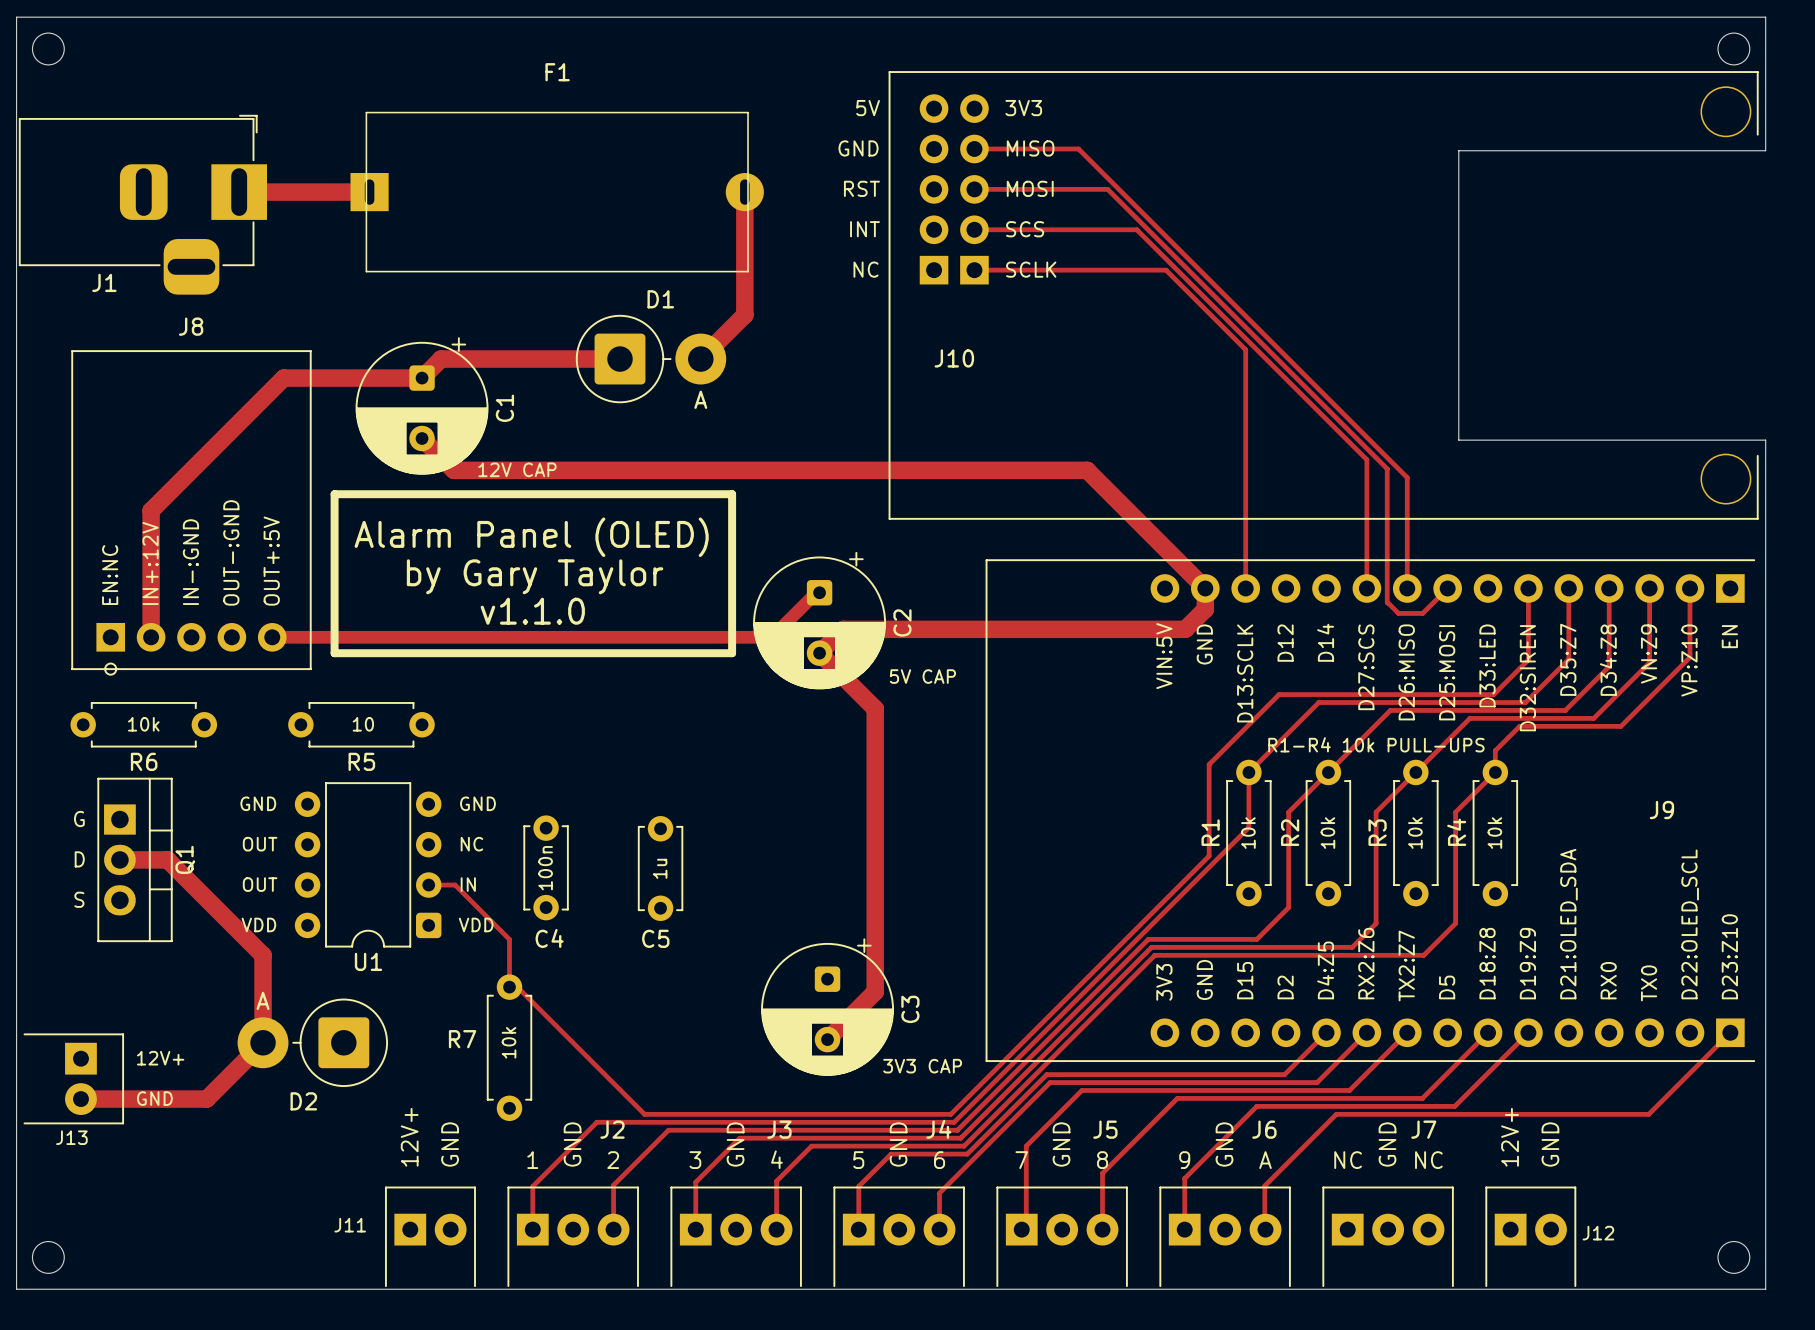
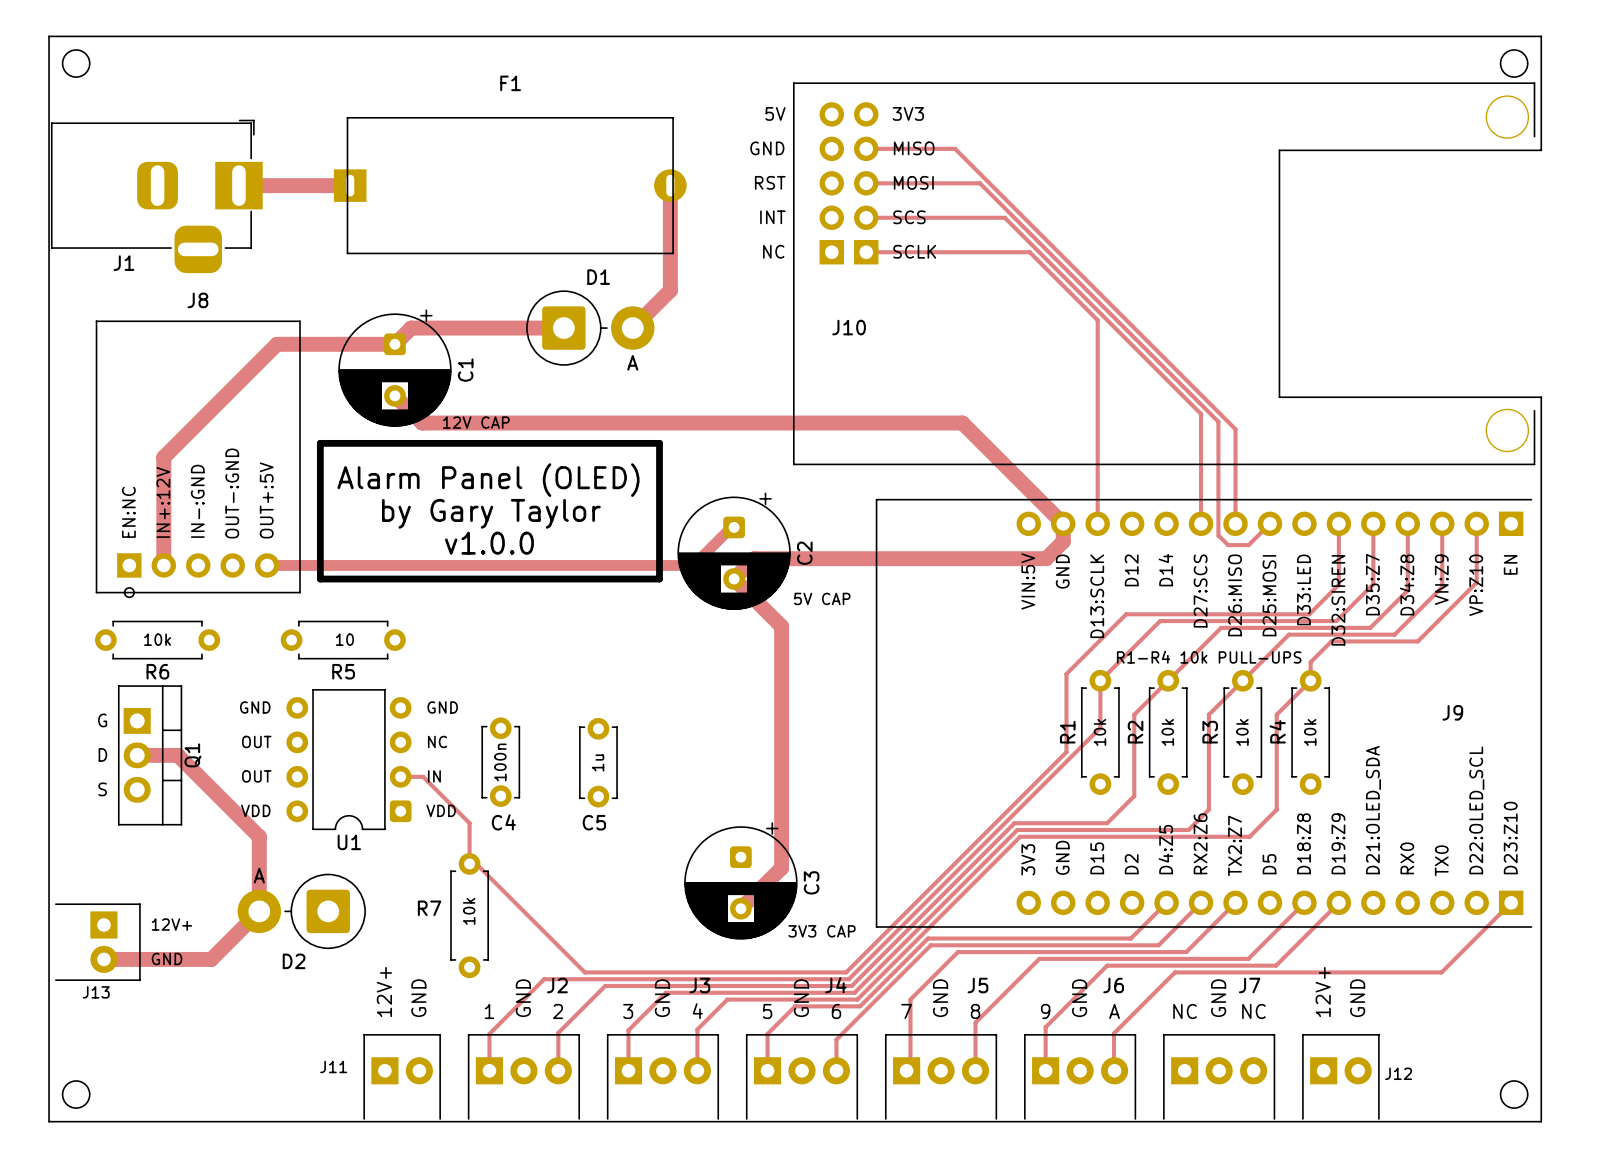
text: v1.1.0 (532, 611) -> v1.0.0 (489, 543)

